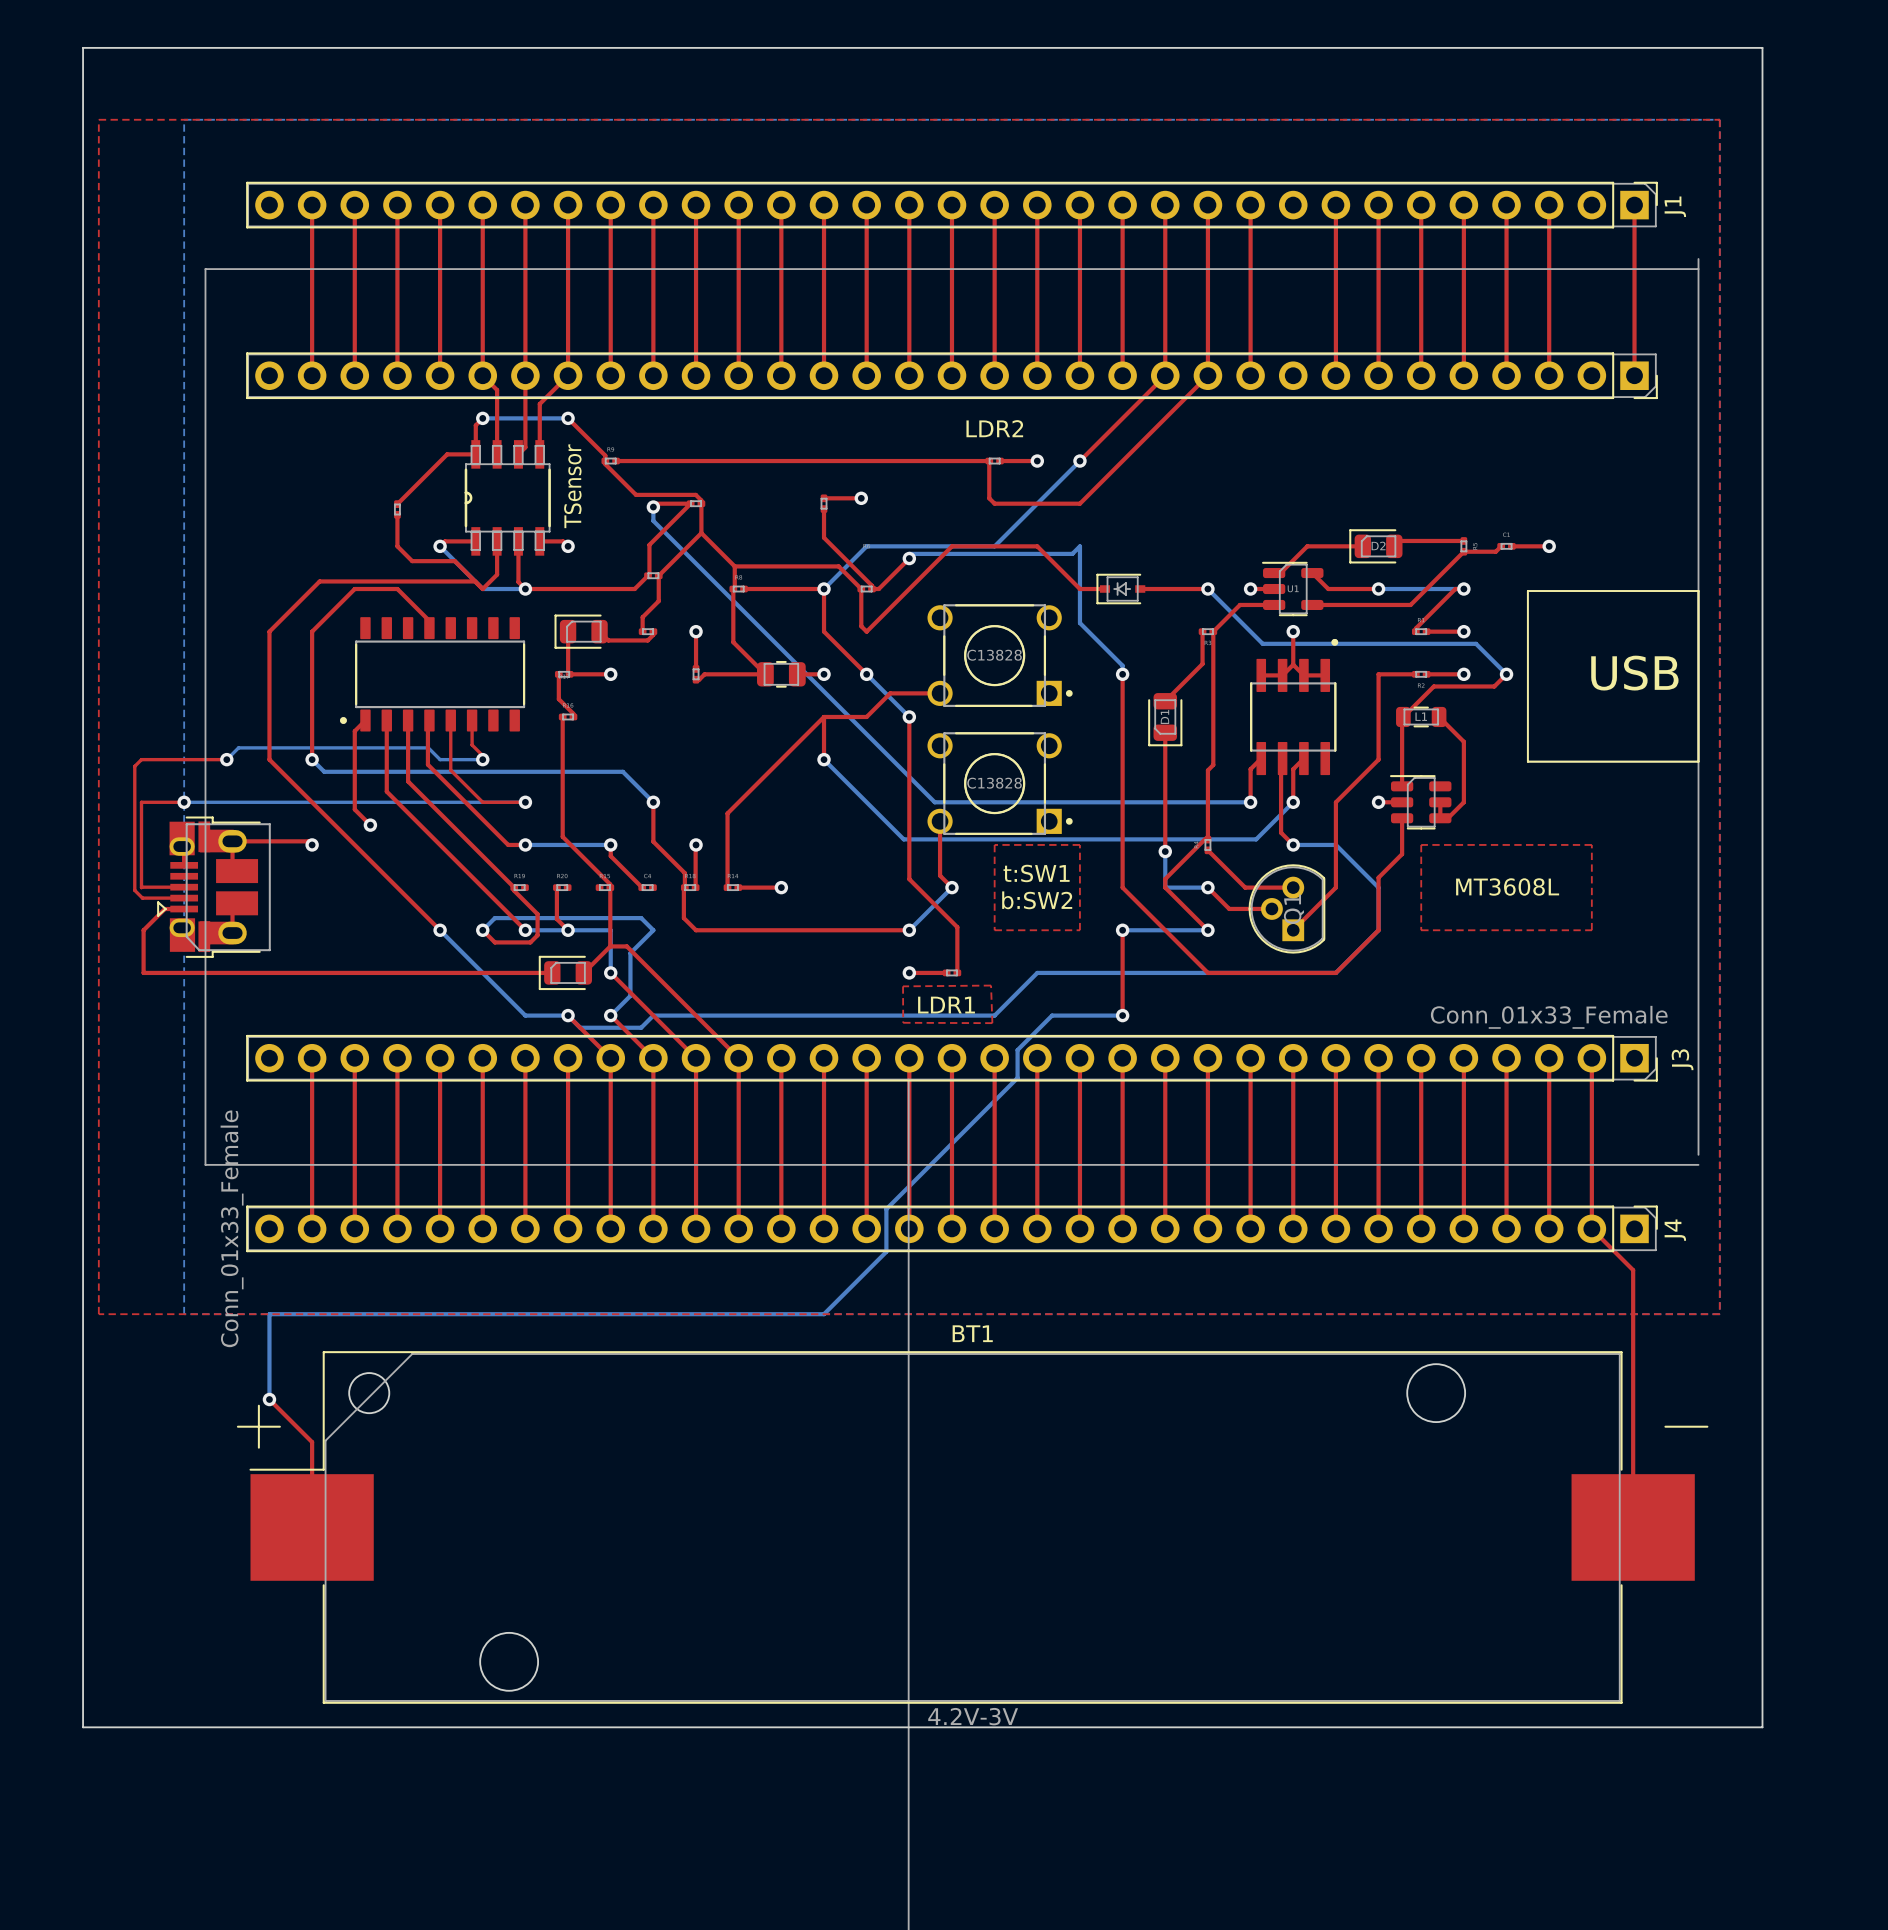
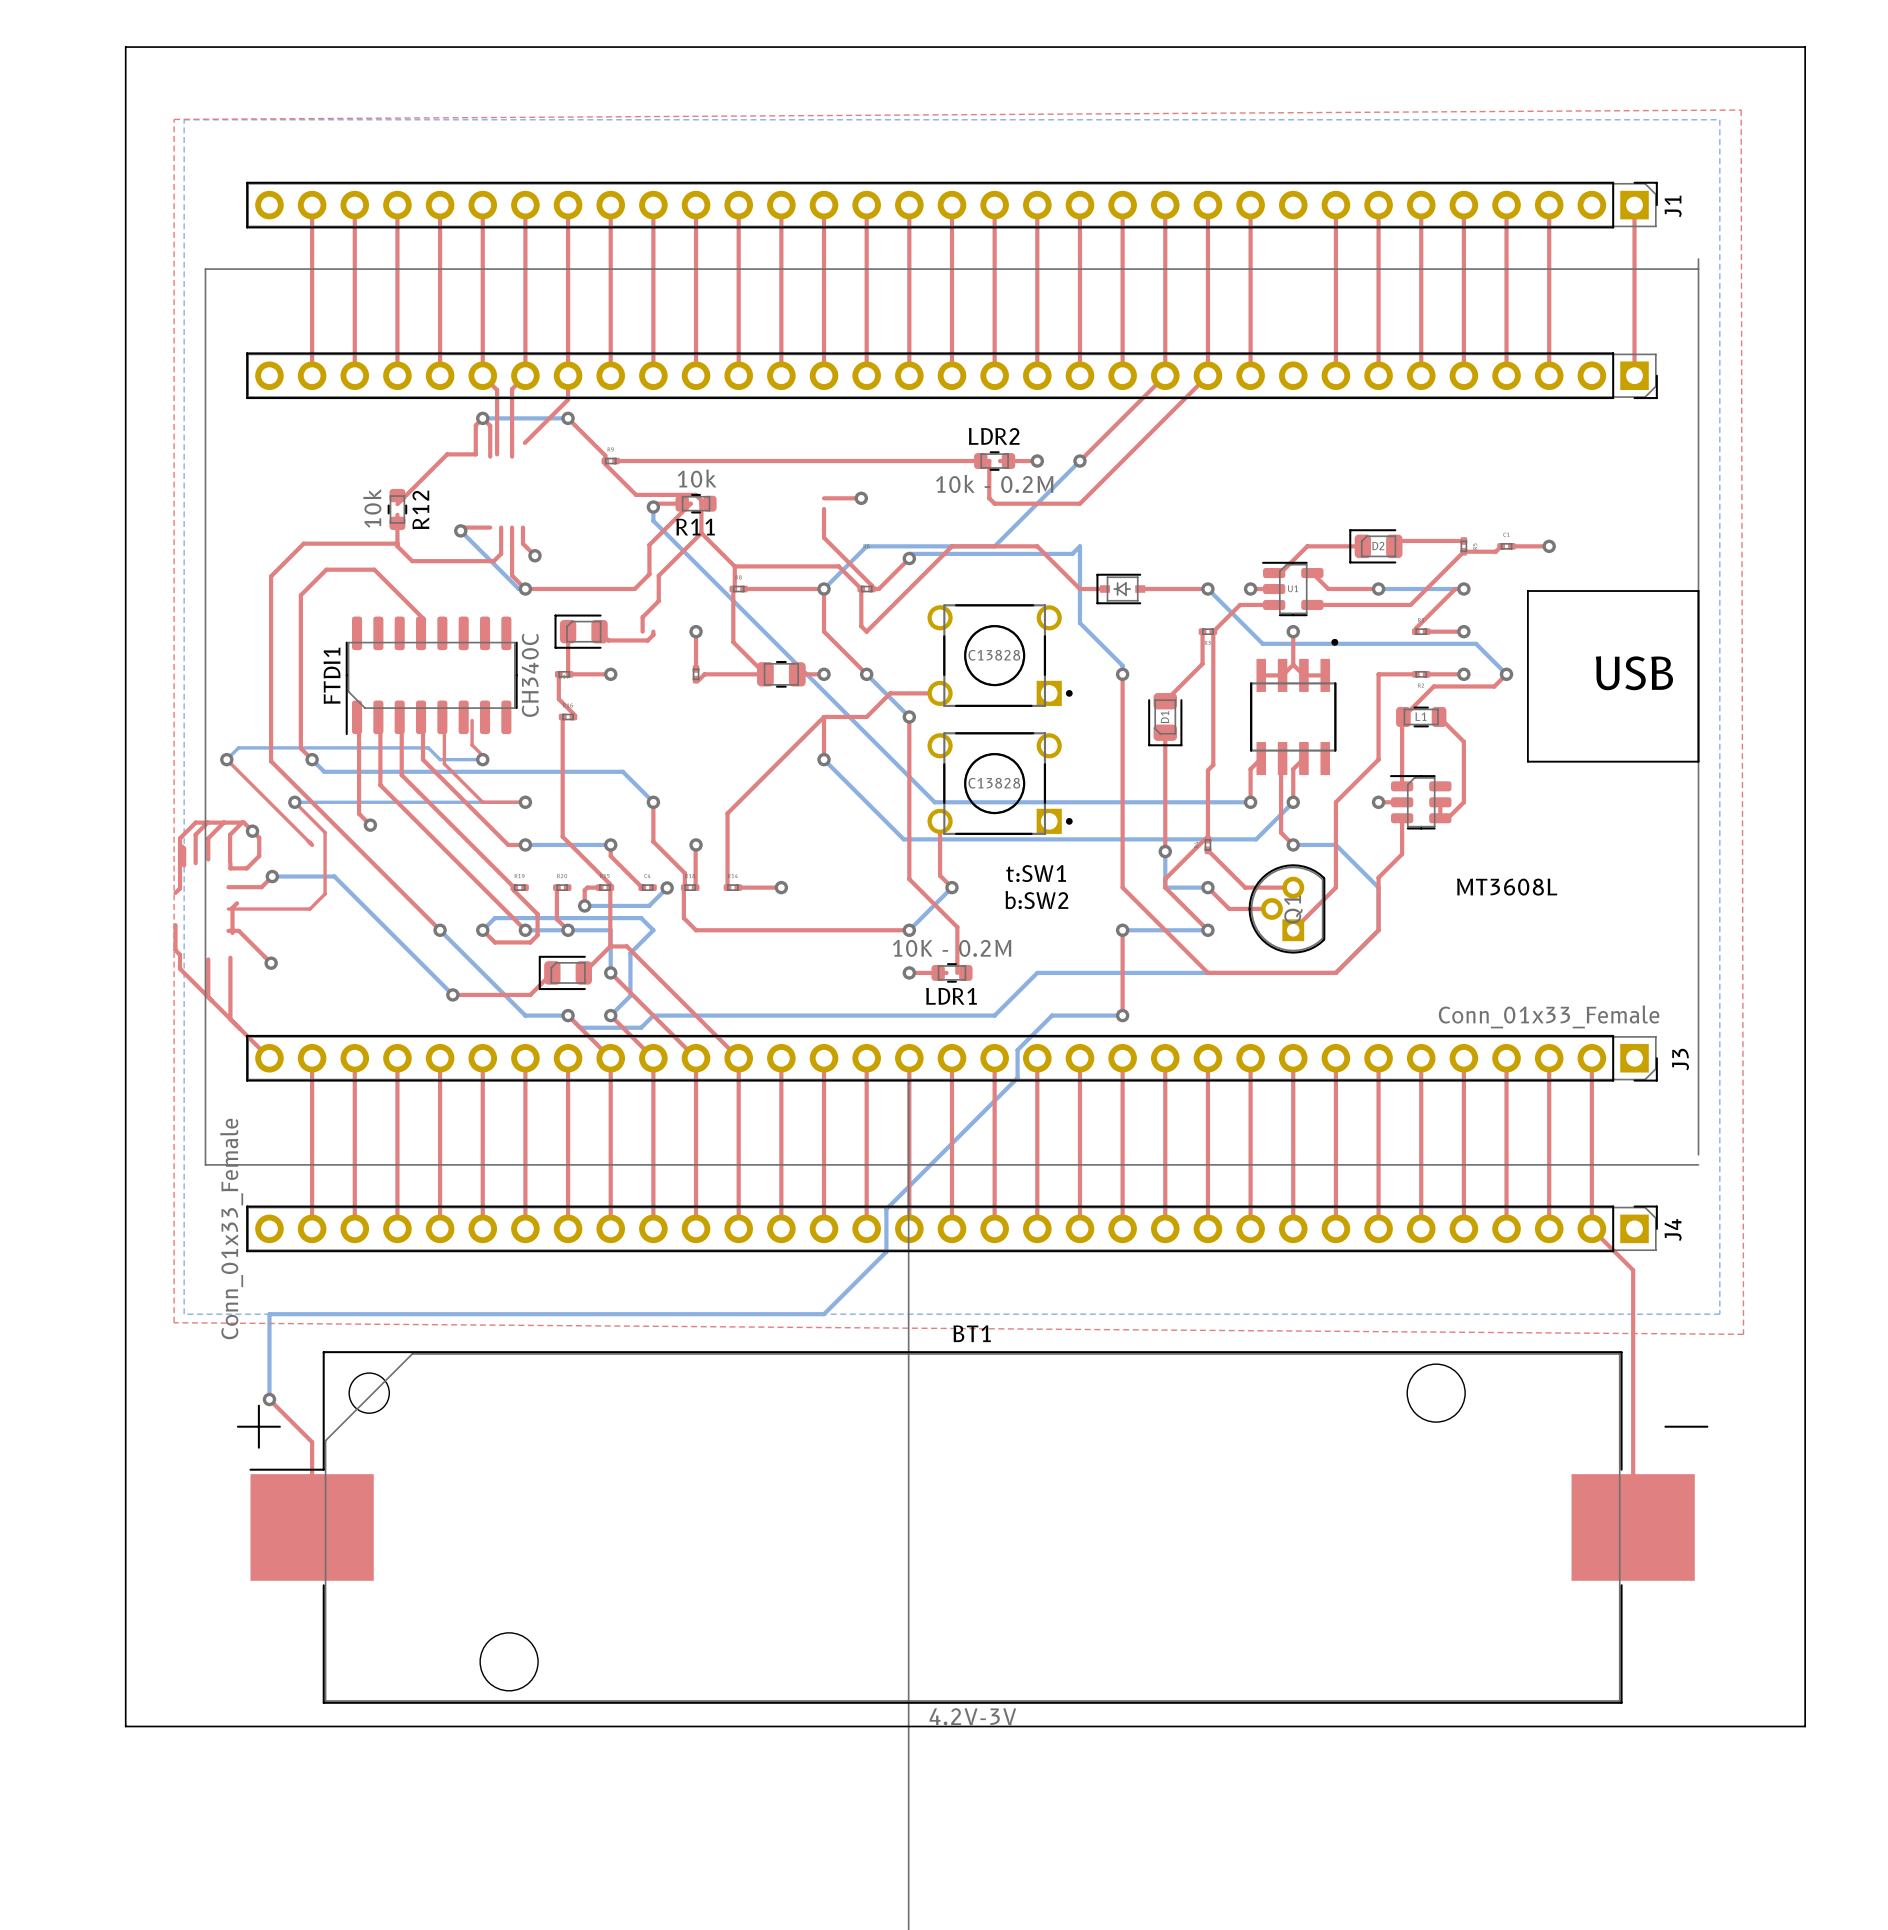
board edge: (83, 47) (1762, 47) (1762, 1727) (83, 1727) (83, 47) -> (125, 47) (1805, 47) (1805, 1726) (125, 1726) (125, 47)
top zone outline: (98, 119) (98, 1314) (1719, 1314) (1719, 119) (98, 119) -> (1741, 110) (174, 119) (174, 1322) (1743, 1334) (1741, 110)
top track: (525, 375) (525, 447) (518, 454) -> (525, 375) (512, 389) (512, 456)
top track: (568, 375) (539, 404) (539, 454) -> (568, 375) (568, 399) (524, 442)
top track: none -> (482, 418) (490, 425) (490, 456)
LDR2 footprint: [985, 457, 1004, 465] -> [974, 451, 1016, 471]
LDR2 value: none -> 10k - 0.2M (994, 483)
TSensor: (507, 497) -> none
part: (696, 503) -> none
R11: none -> 10k (696, 503)
part: (824, 503) -> none
part: (397, 509) -> none
R12: none -> 10k (397, 509)
top track: none -> (490, 527) (464, 527) (460, 530)
top track: none -> (522, 527) (522, 543) (534, 555)
top track: (475, 541) (445, 541) (440, 546) -> none
top track: (497, 541) (497, 574) (482, 589) (454, 561) -> (501, 527) (501, 553) (493, 561) (454, 561)
top track: (518, 541) (518, 582) -> (512, 527) (512, 575) (518, 582)
top track: (539, 541) (563, 541) (568, 546) -> none
bottom track: (440, 546) (482, 589) (518, 589) -> (460, 530) (518, 589)
via position: (440, 546) -> (460, 530)
via position: (568, 546) -> (534, 555)
part: (653, 575) -> none
top track: (475, 581) (319, 581) (269, 631) (269, 759) (271, 761) -> (397, 543) (303, 543) (271, 576) (271, 761)
top track: (429, 628) (429, 621) (397, 589) (354, 589) (312, 631) (312, 759) -> (423, 625) (423, 618) (374, 569) (326, 569) (300, 595) (300, 748) (312, 759)
part: (648, 631) -> none
part: (432, 674) -> none
FTDI1: none -> CH340C (431, 675)
top track: (365, 720) (354, 731) (354, 809) (359, 813) -> (359, 709) (359, 813)
top track: (386, 720) (386, 791) -> (380, 709) (380, 785) (386, 791)
top track: (408, 720) (408, 781) -> (401, 709) (401, 775) (408, 781)
top track: (429, 720) (427, 764) -> (423, 709) (423, 759) (427, 764)
top track: (450, 720) (450, 770) -> (444, 709) (444, 763) (450, 770)
top track: (226, 759) (141, 759) (134, 766) (134, 890) (142, 898) (184, 898) -> none
top track: (184, 802) (141, 802) (141, 887) (184, 887) -> none
bottom track: (184, 802) (294, 802) -> none
via: (184, 802) -> none
top track: none -> (294, 802) (325, 832) (325, 893) (310, 909) (228, 909)
via: none -> (294, 802)
top track: none -> (207, 822) (195, 834) (195, 863)
top track: none -> (223, 822) (208, 838) (208, 859)
top track: none -> (242, 822) (230, 834) (230, 861)
via: none -> (252, 831)
top track: (308, 841) (232, 841) (232, 866) (237, 871) -> (308, 841) (226, 759)
via: (312, 844) -> none
top zone outline: (994, 844) (994, 930) (1079, 930) (1079, 844) (994, 844) -> none
top zone outline: (1421, 844) (1591, 844) (1591, 930) (1421, 930) (1421, 844) -> none
top track: none -> (230, 862) (230, 868) (246, 868) (259, 856) (259, 837) (243, 822) (195, 822) (180, 838) (180, 888) (175, 892)
top track: none -> (272, 876) (261, 887) (228, 887)
bottom track: none -> (272, 876) (334, 876) (452, 994)
via: none -> (272, 876)
part: (213, 887) -> none
top track: none -> (599, 887) (587, 887) (584, 890) (584, 905)
bottom track: none -> (667, 887) (649, 905) (584, 905)
via: none -> (667, 887)
via: none -> (584, 905)
top track: (184, 909) (164, 909) (143, 930) (143, 972) (552, 972) -> (452, 994) (530, 994) (552, 972)
top track: none -> (175, 925) (175, 950) (180, 954) (180, 968) (269, 1058)
top track: none -> (228, 930) (238, 930) (271, 963)
LDR1 value: none -> 10K - 0.2M (952, 948)
top track: none -> (230, 957) (230, 1019)
top track: none -> (208, 959) (208, 997)
via: none -> (271, 963)
LDR1 footprint: [942, 969, 962, 977] -> [931, 963, 973, 983]
top zone outline: (991, 985) (992, 1023) (903, 1022) (903, 986) (991, 985) -> none
via: none -> (452, 994)

